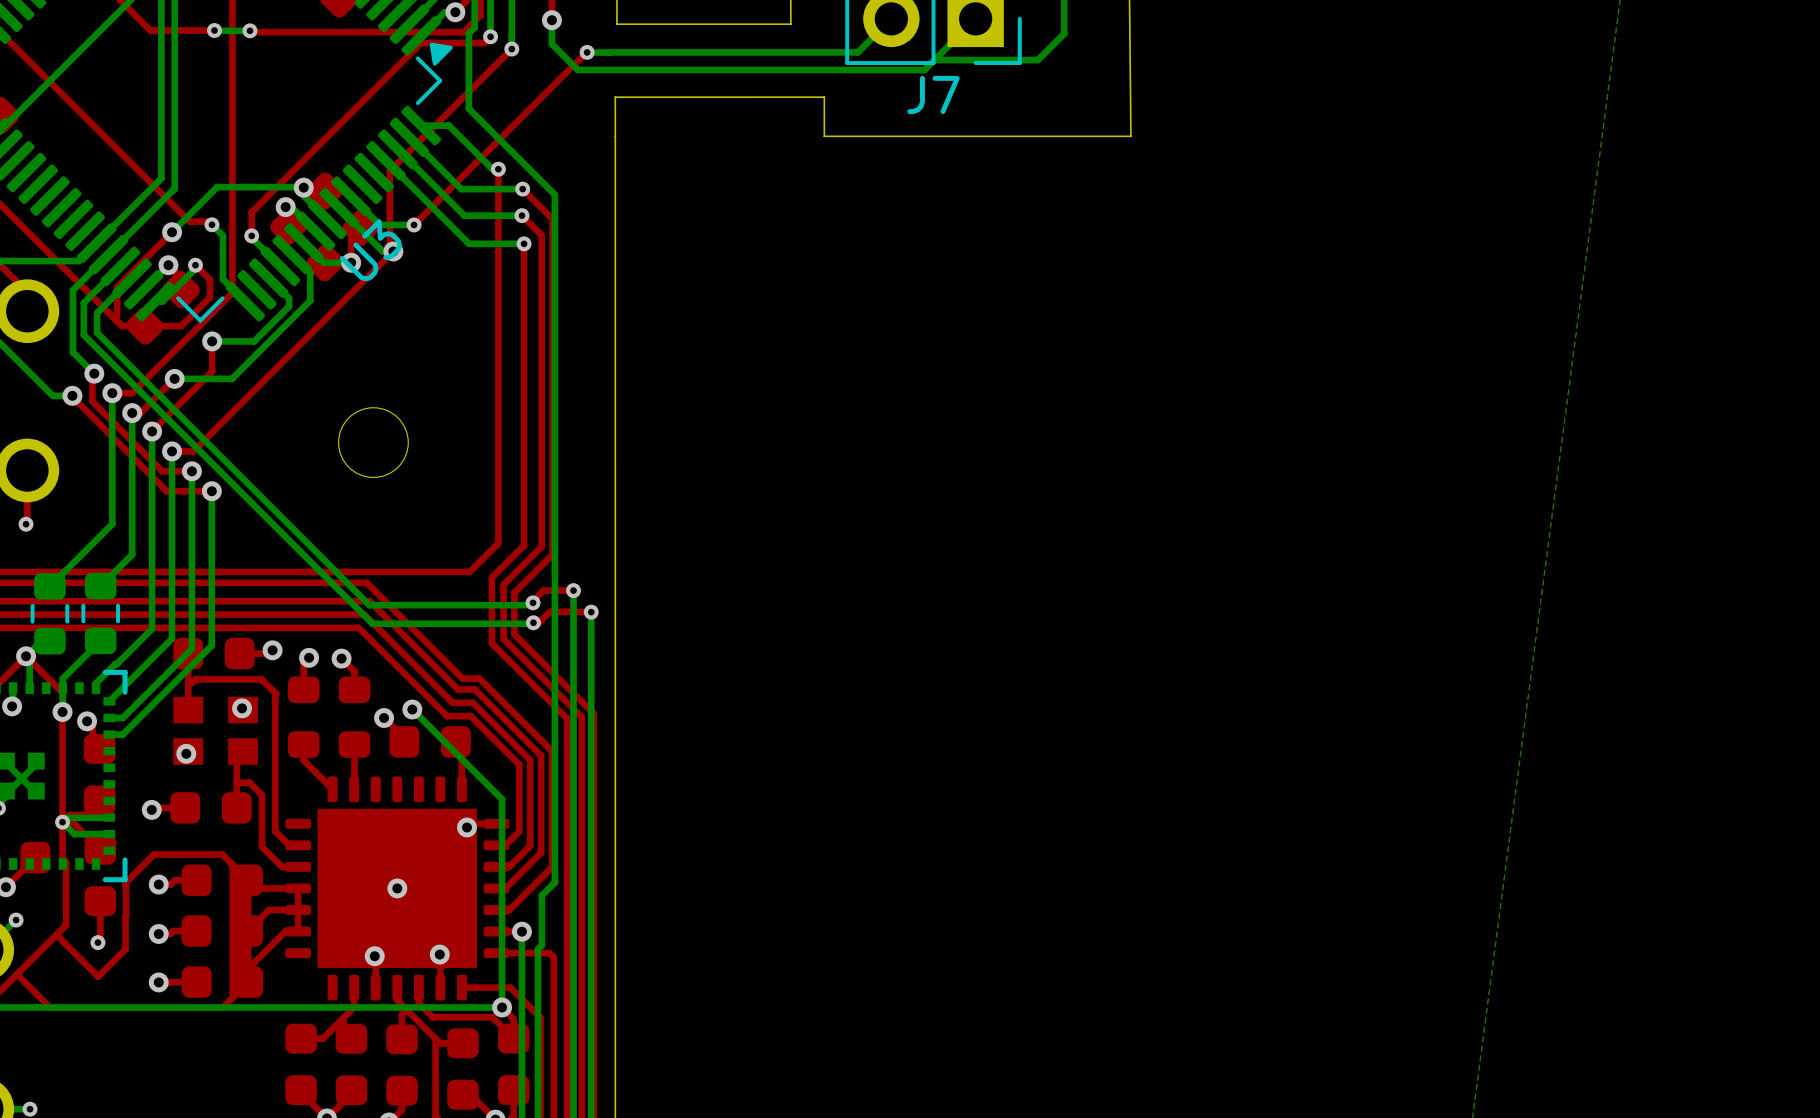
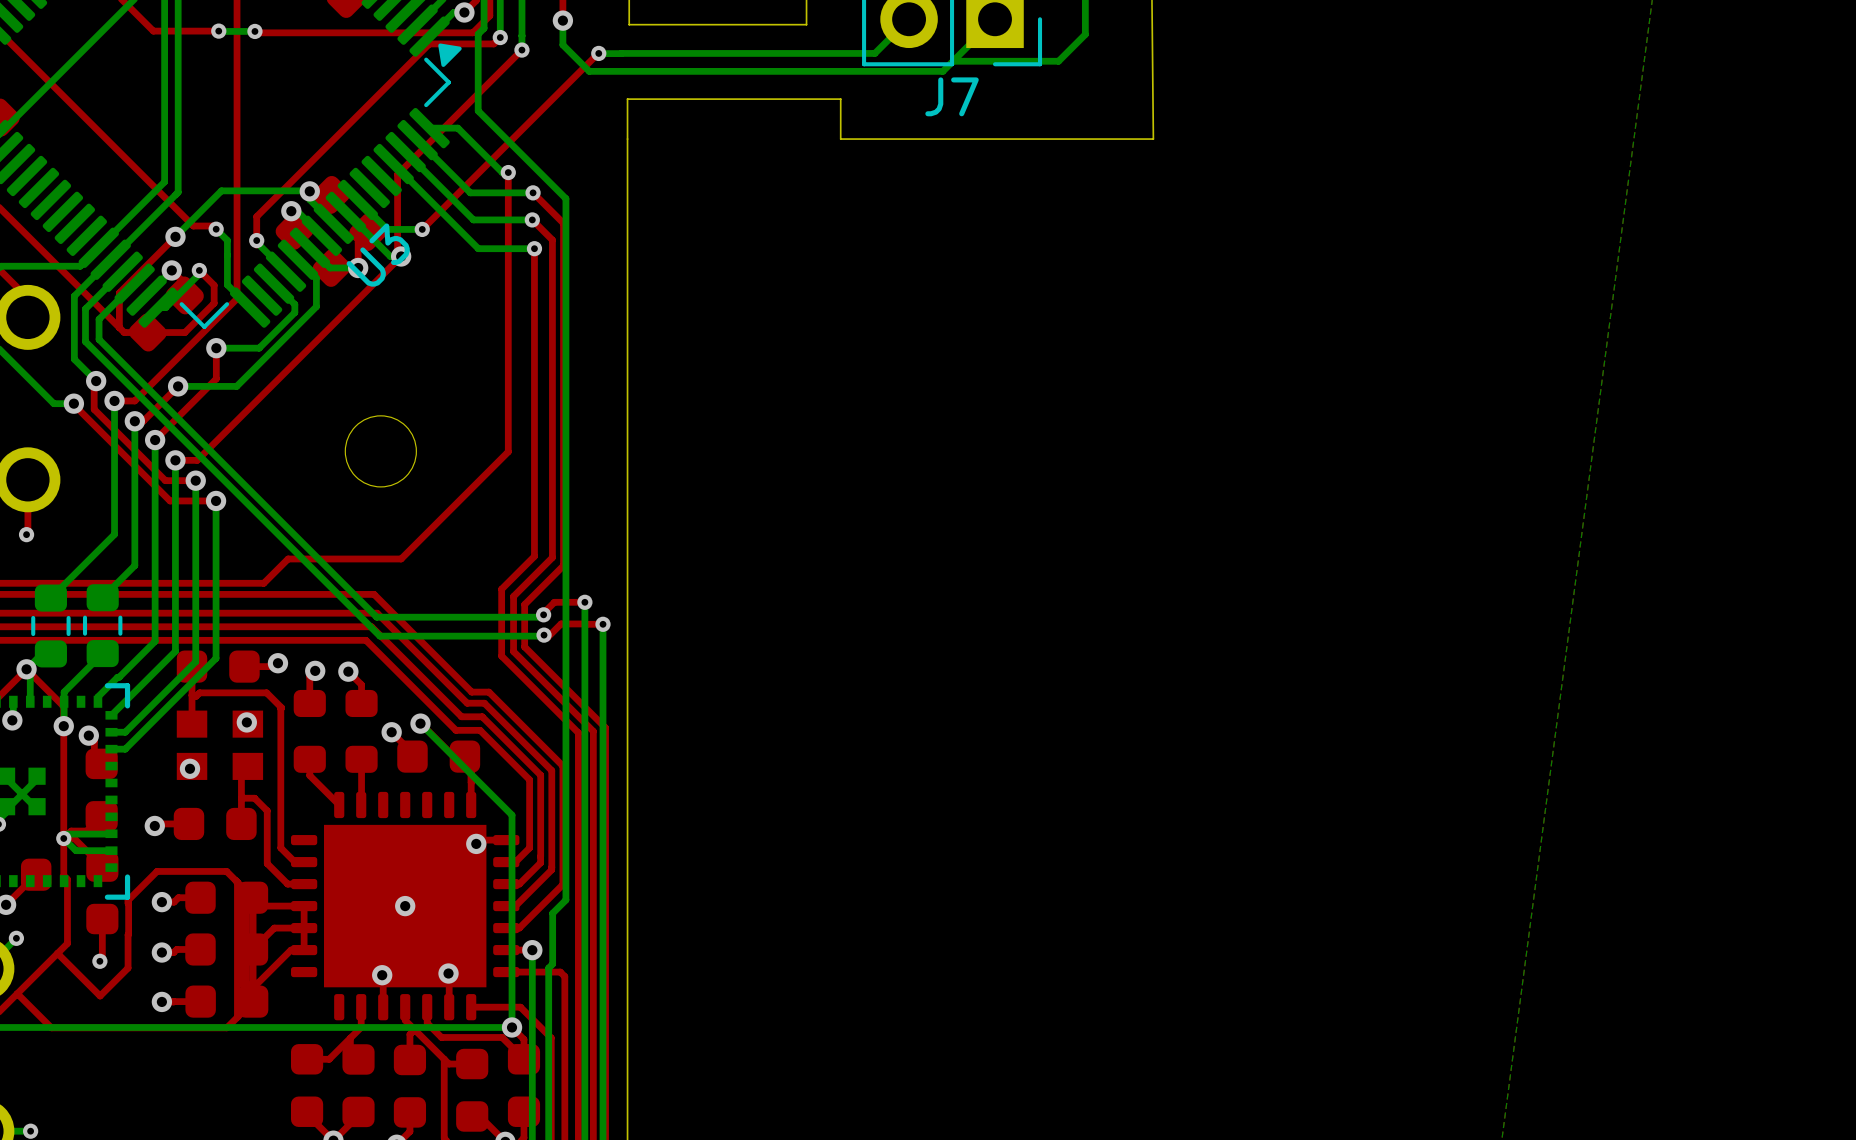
top track: (498, 443) (498, 543) (469, 571) (258, 571) -> (508, 451) (401, 558) (288, 558) (263, 583)

